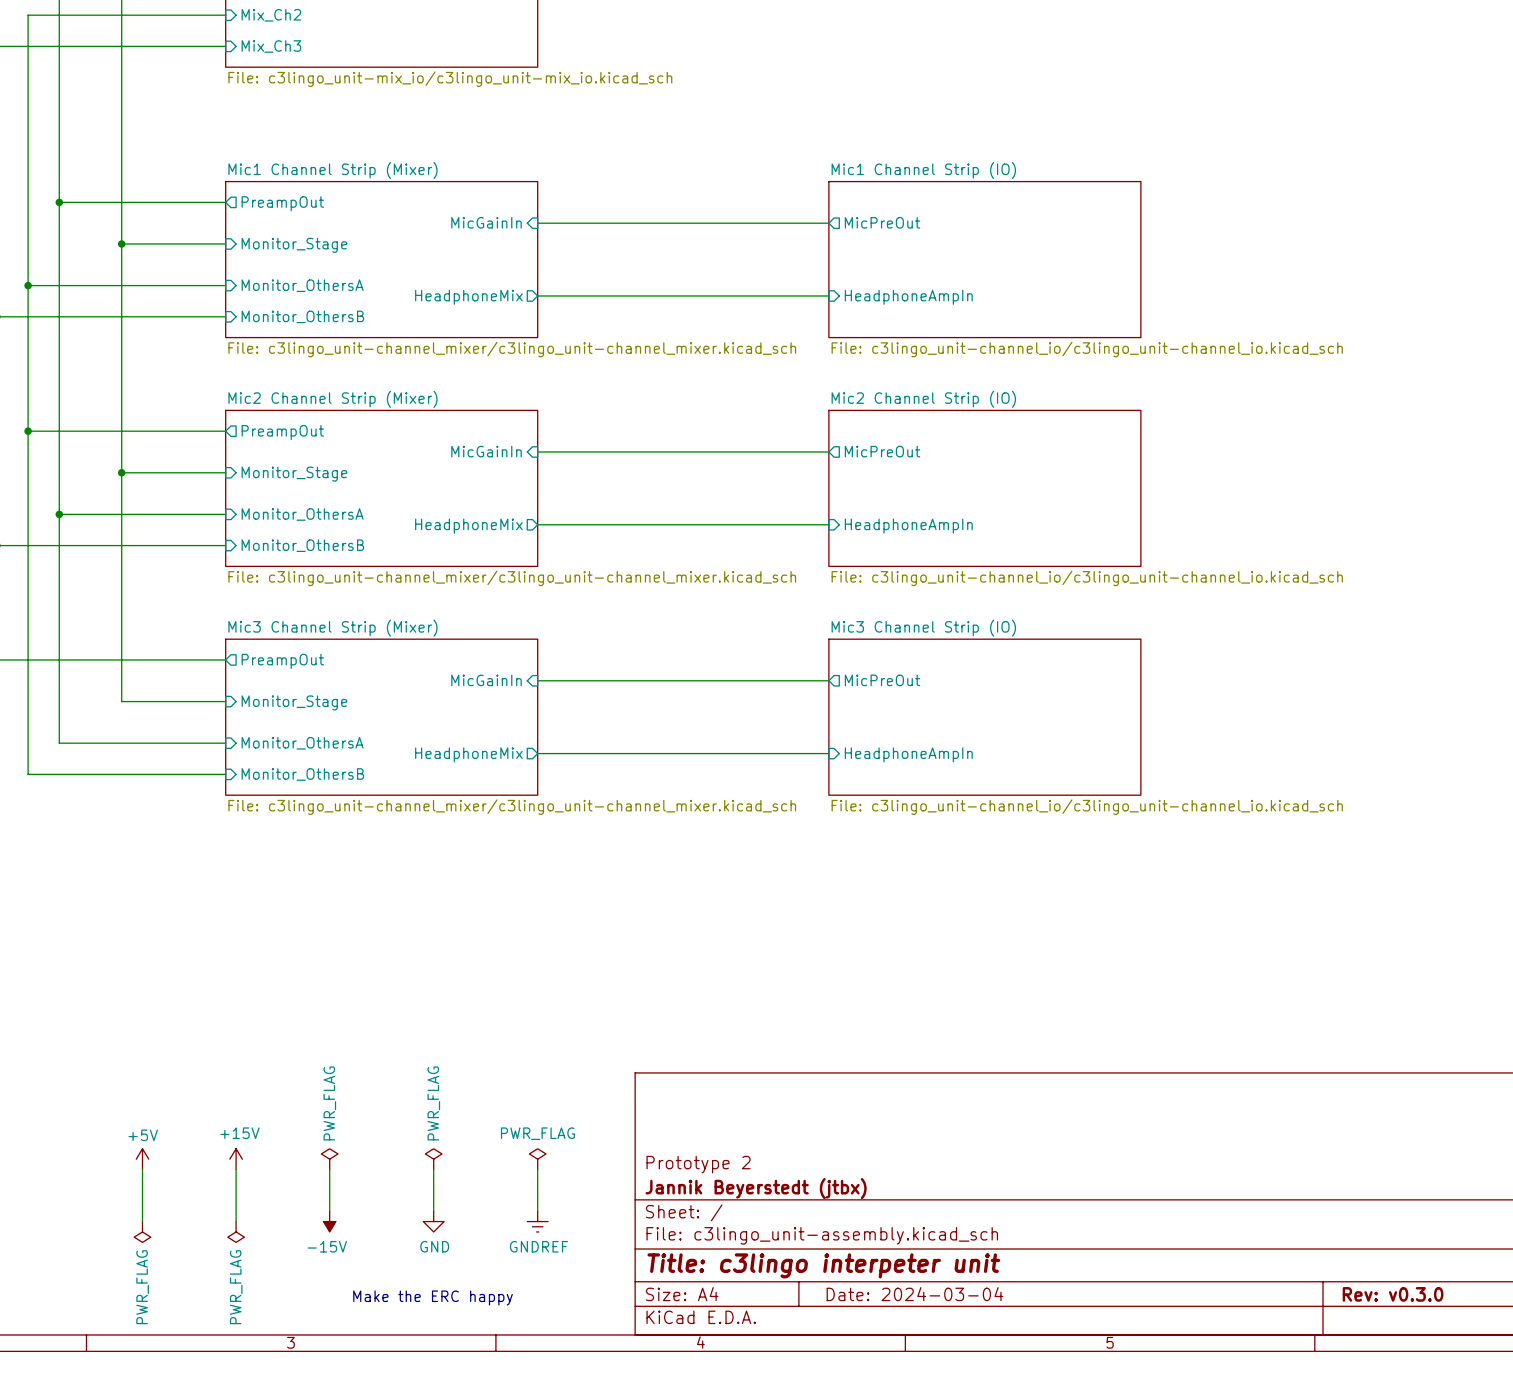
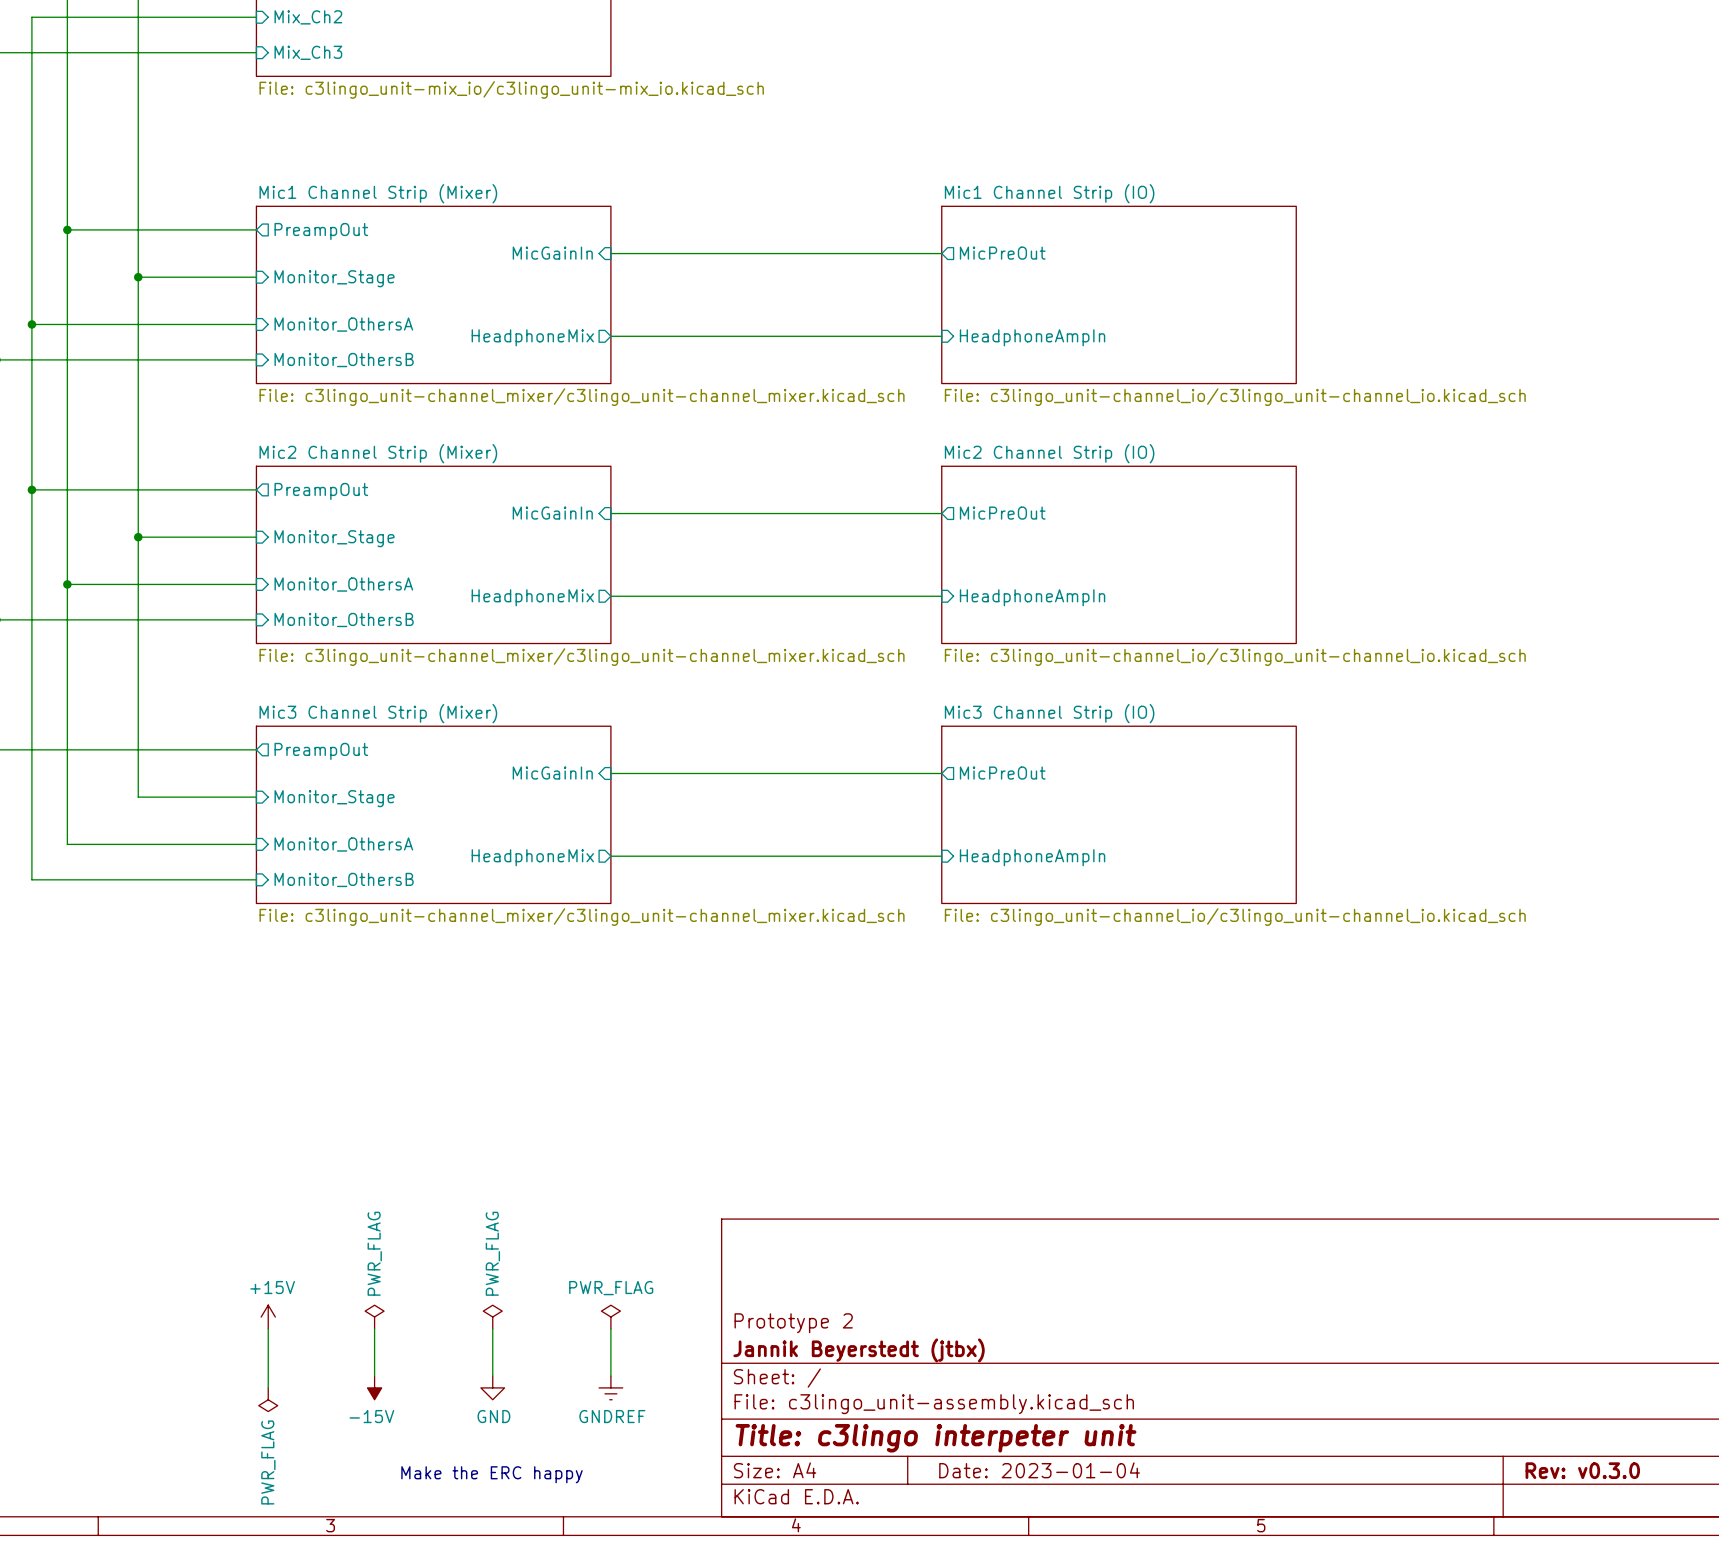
power symbol: +5V (142, 1159) -> none
wire: (142, 1169) (142, 1221) -> none
power symbol: PWR_FLAG (142, 1231) -> none
title block: Date: 2024-03-04 (914, 1294) -> Date: 2023-01-04 (1039, 1470)

